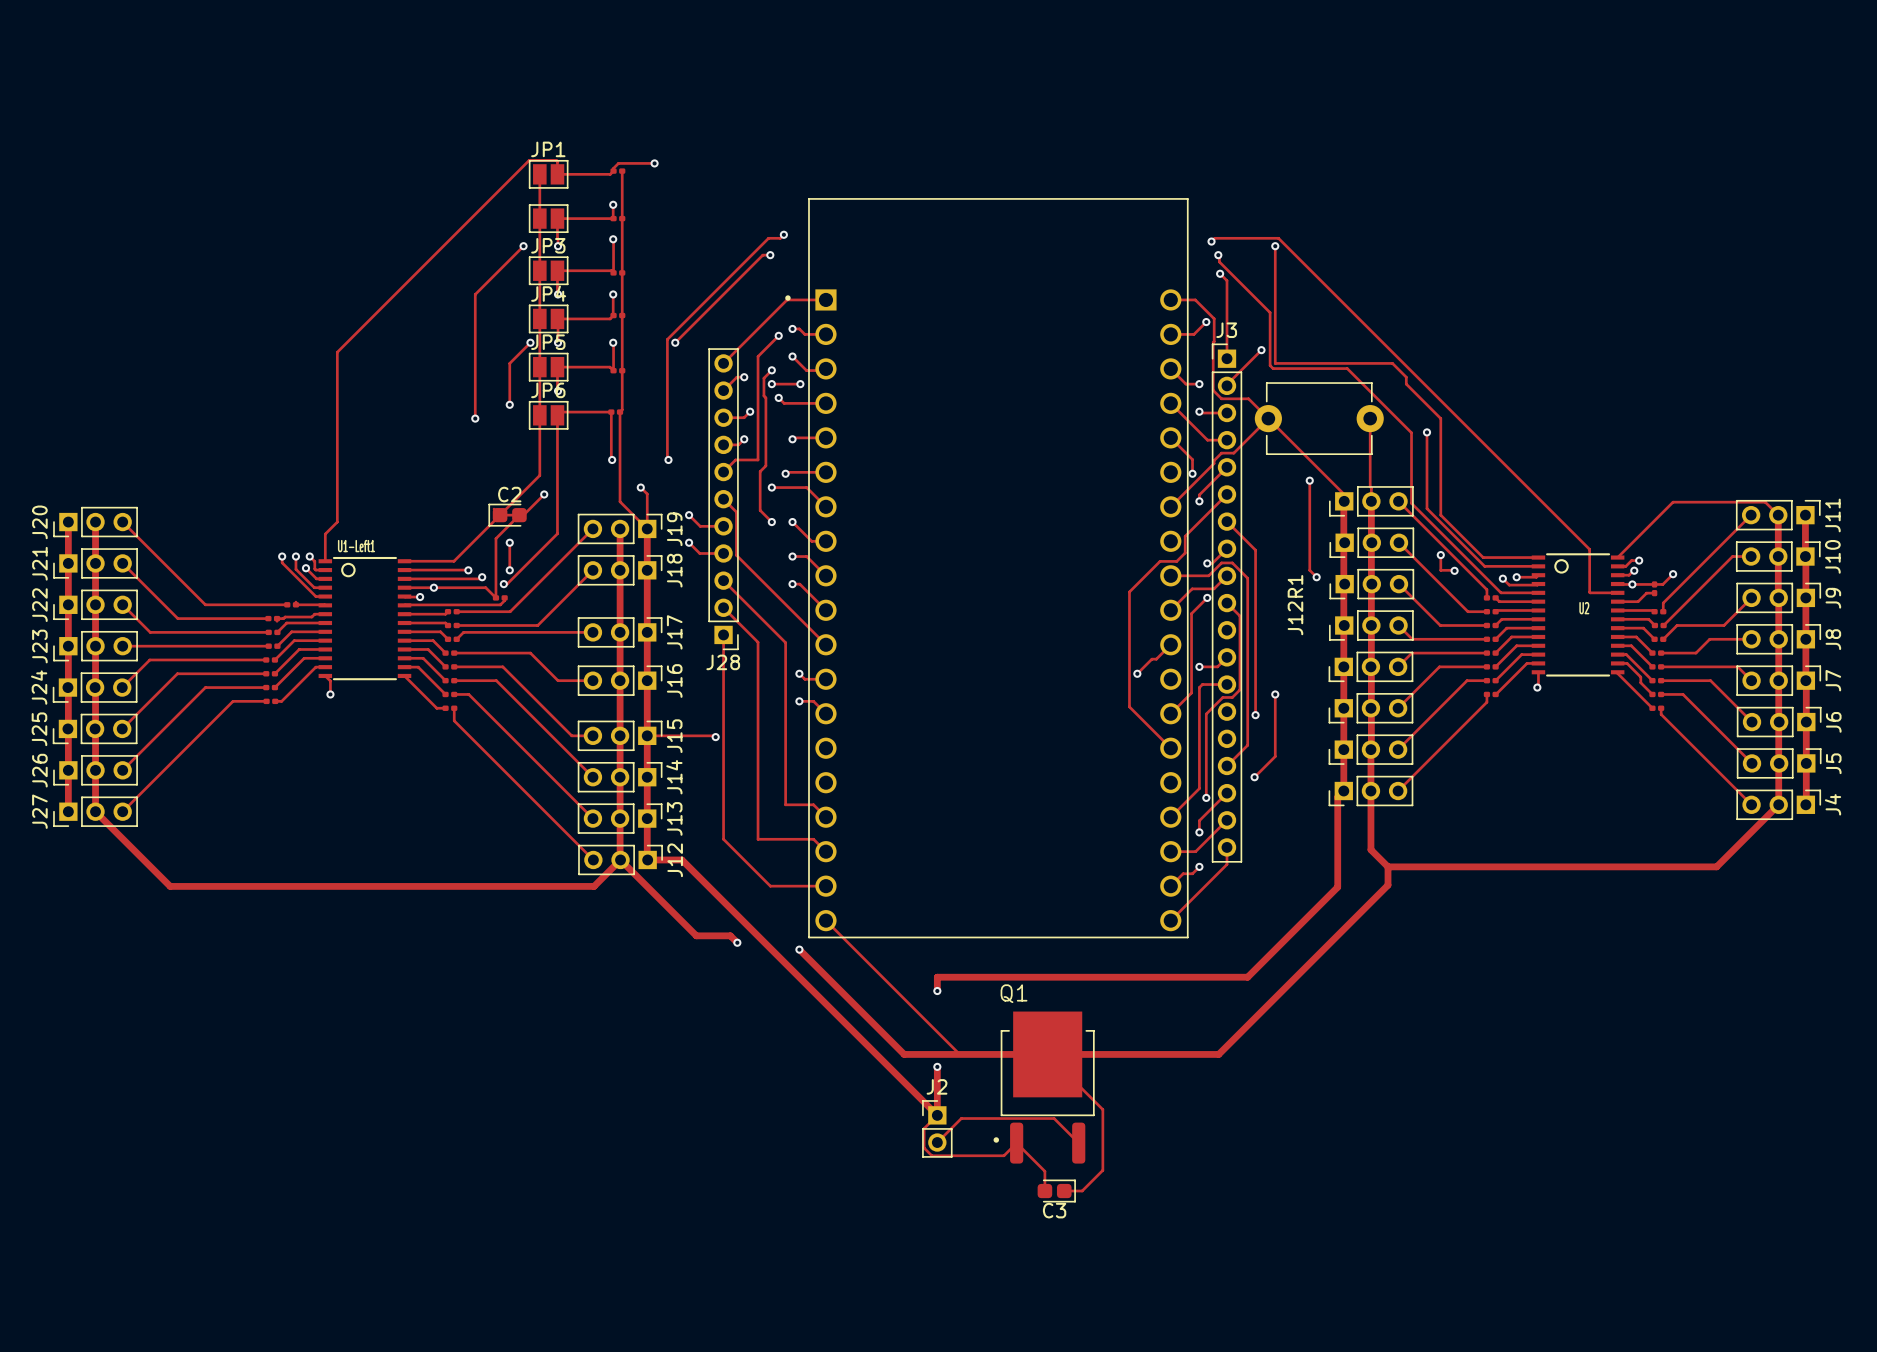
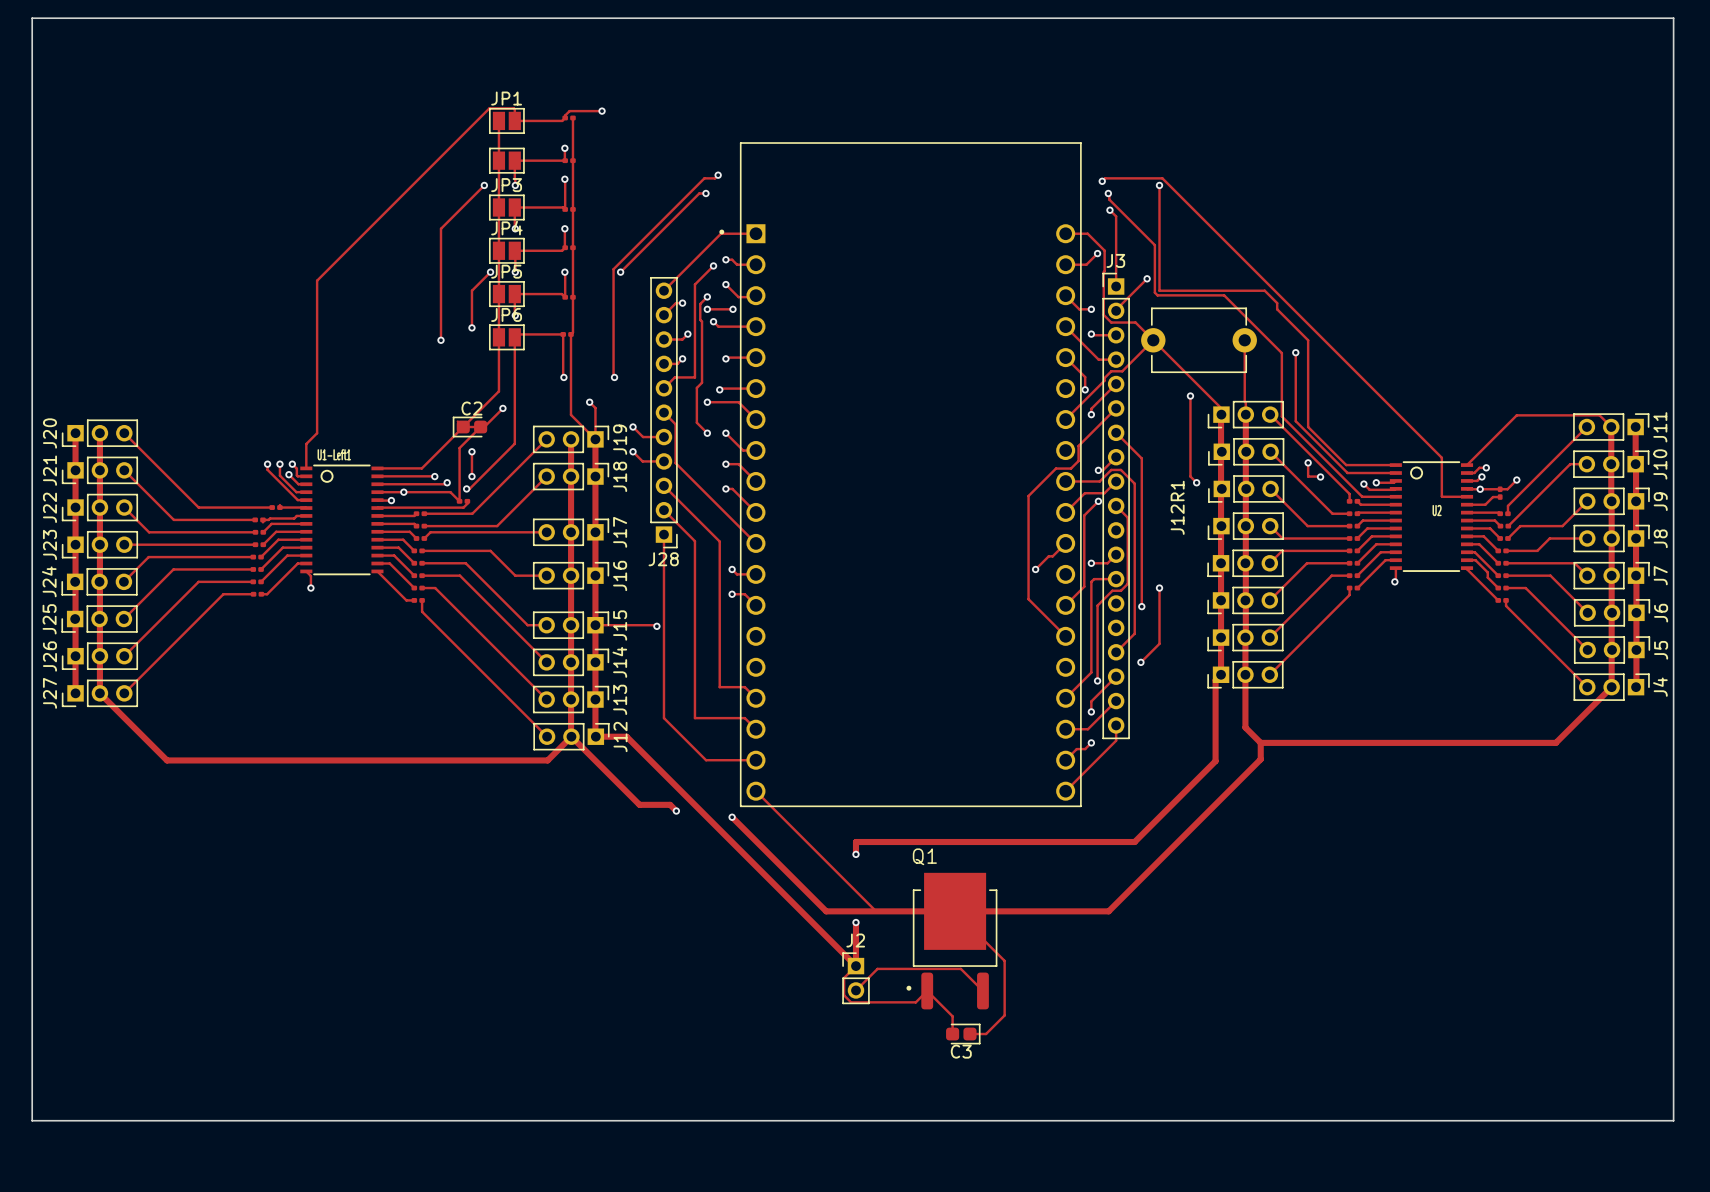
board edge: none -> (32, 18) (1673, 18) (1673, 1120) (32, 1120) (32, 18)

